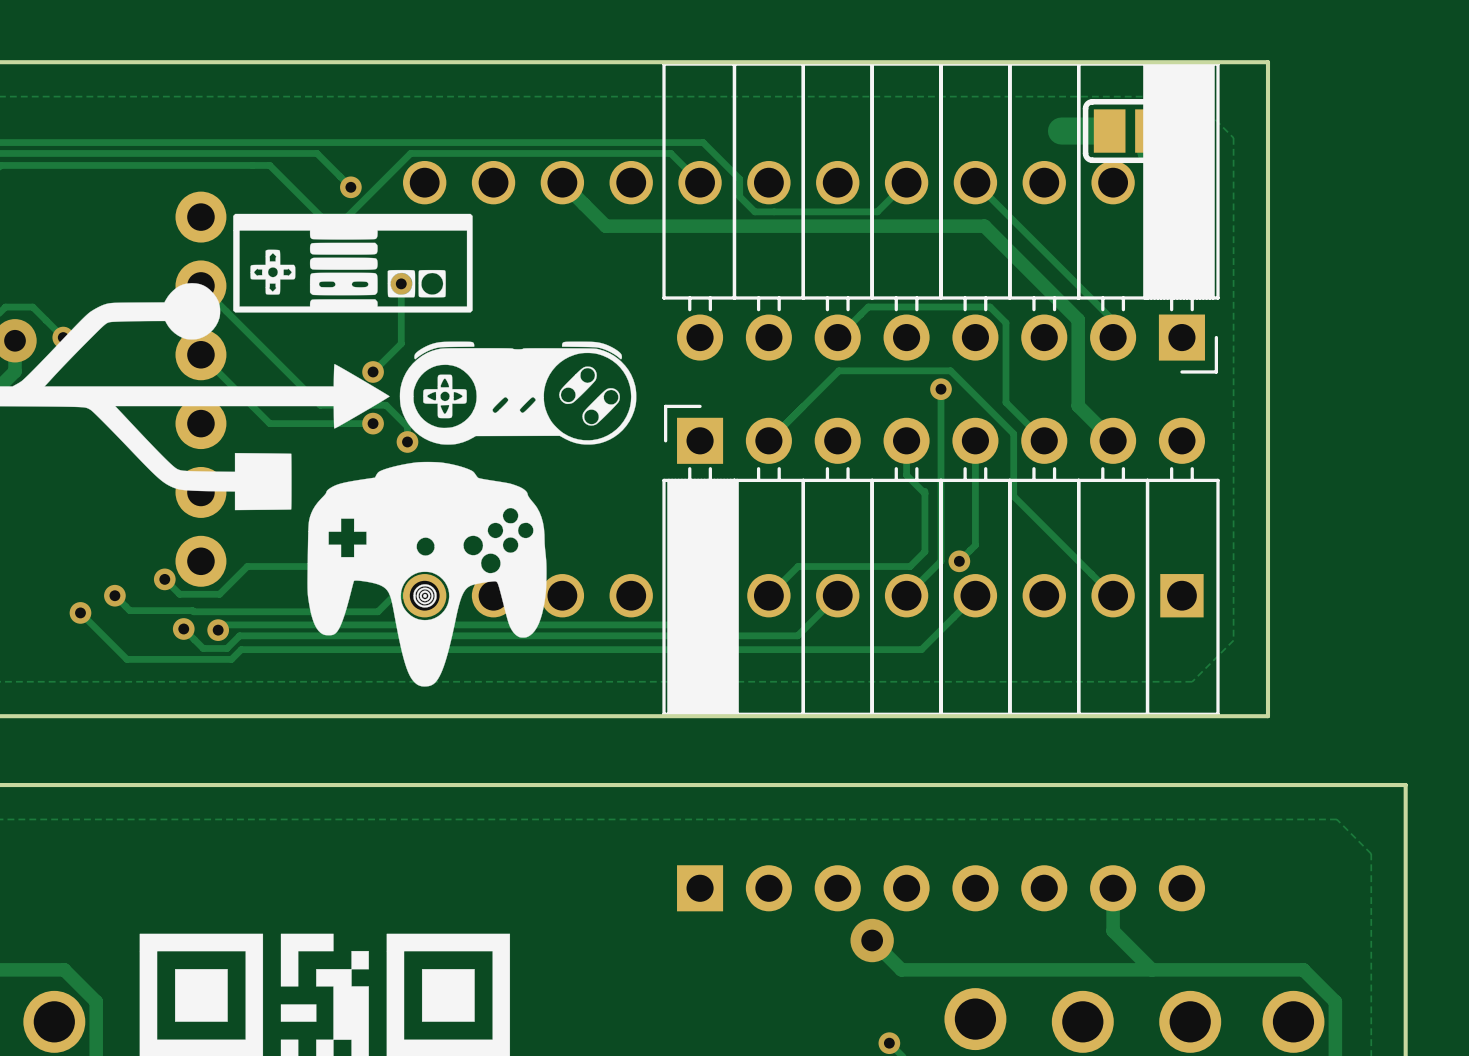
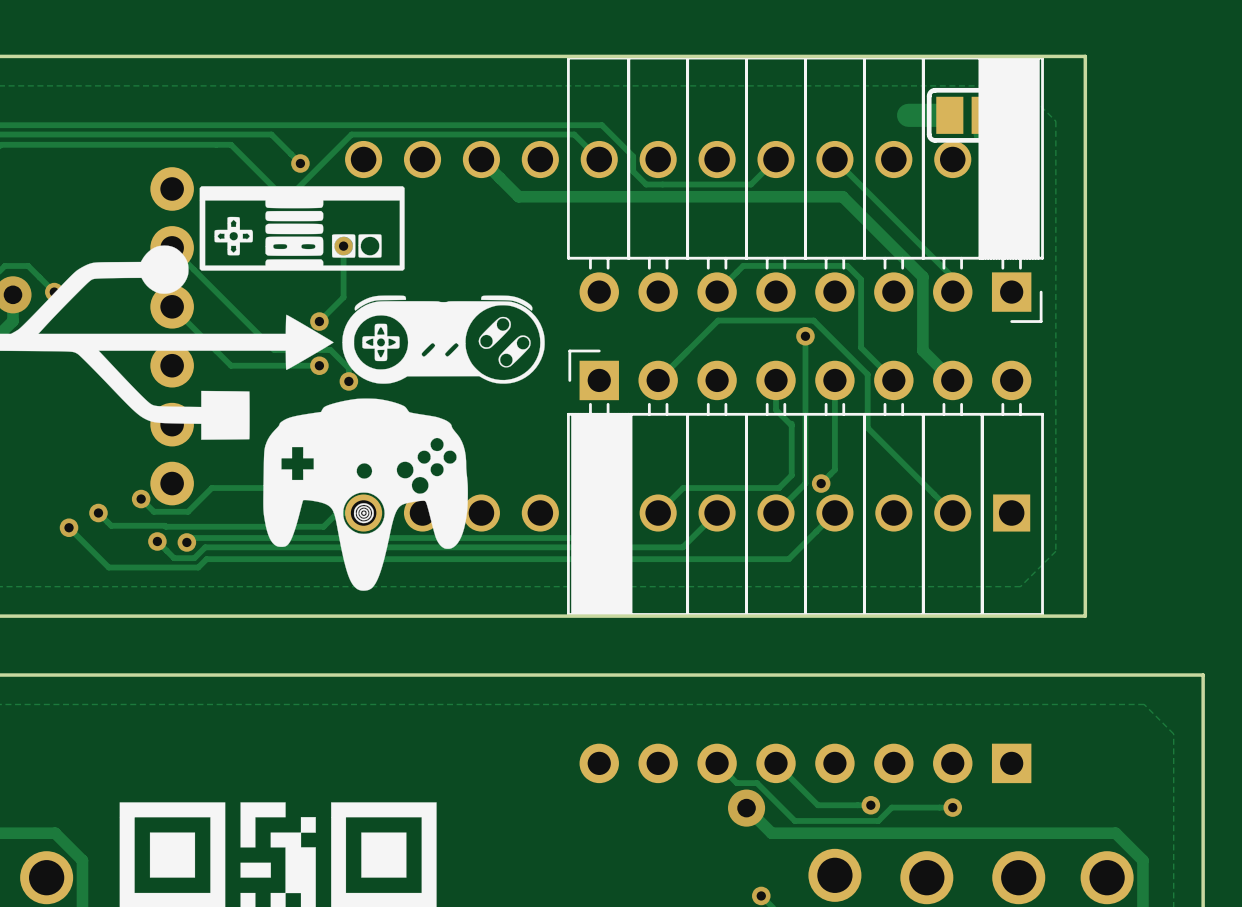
track: none -> (717, 763) (736, 783) (757, 783) (794, 820) (878, 820) (891, 807) (952, 807)
track: none -> (776, 763) (817, 805) (870, 805)
part rotation: 0° (941, 888) -> 180° (805, 763)
track: (1113, 888) (1113, 930) (1152, 969) -> none
via: none -> (870, 805)
via: none -> (952, 807)

